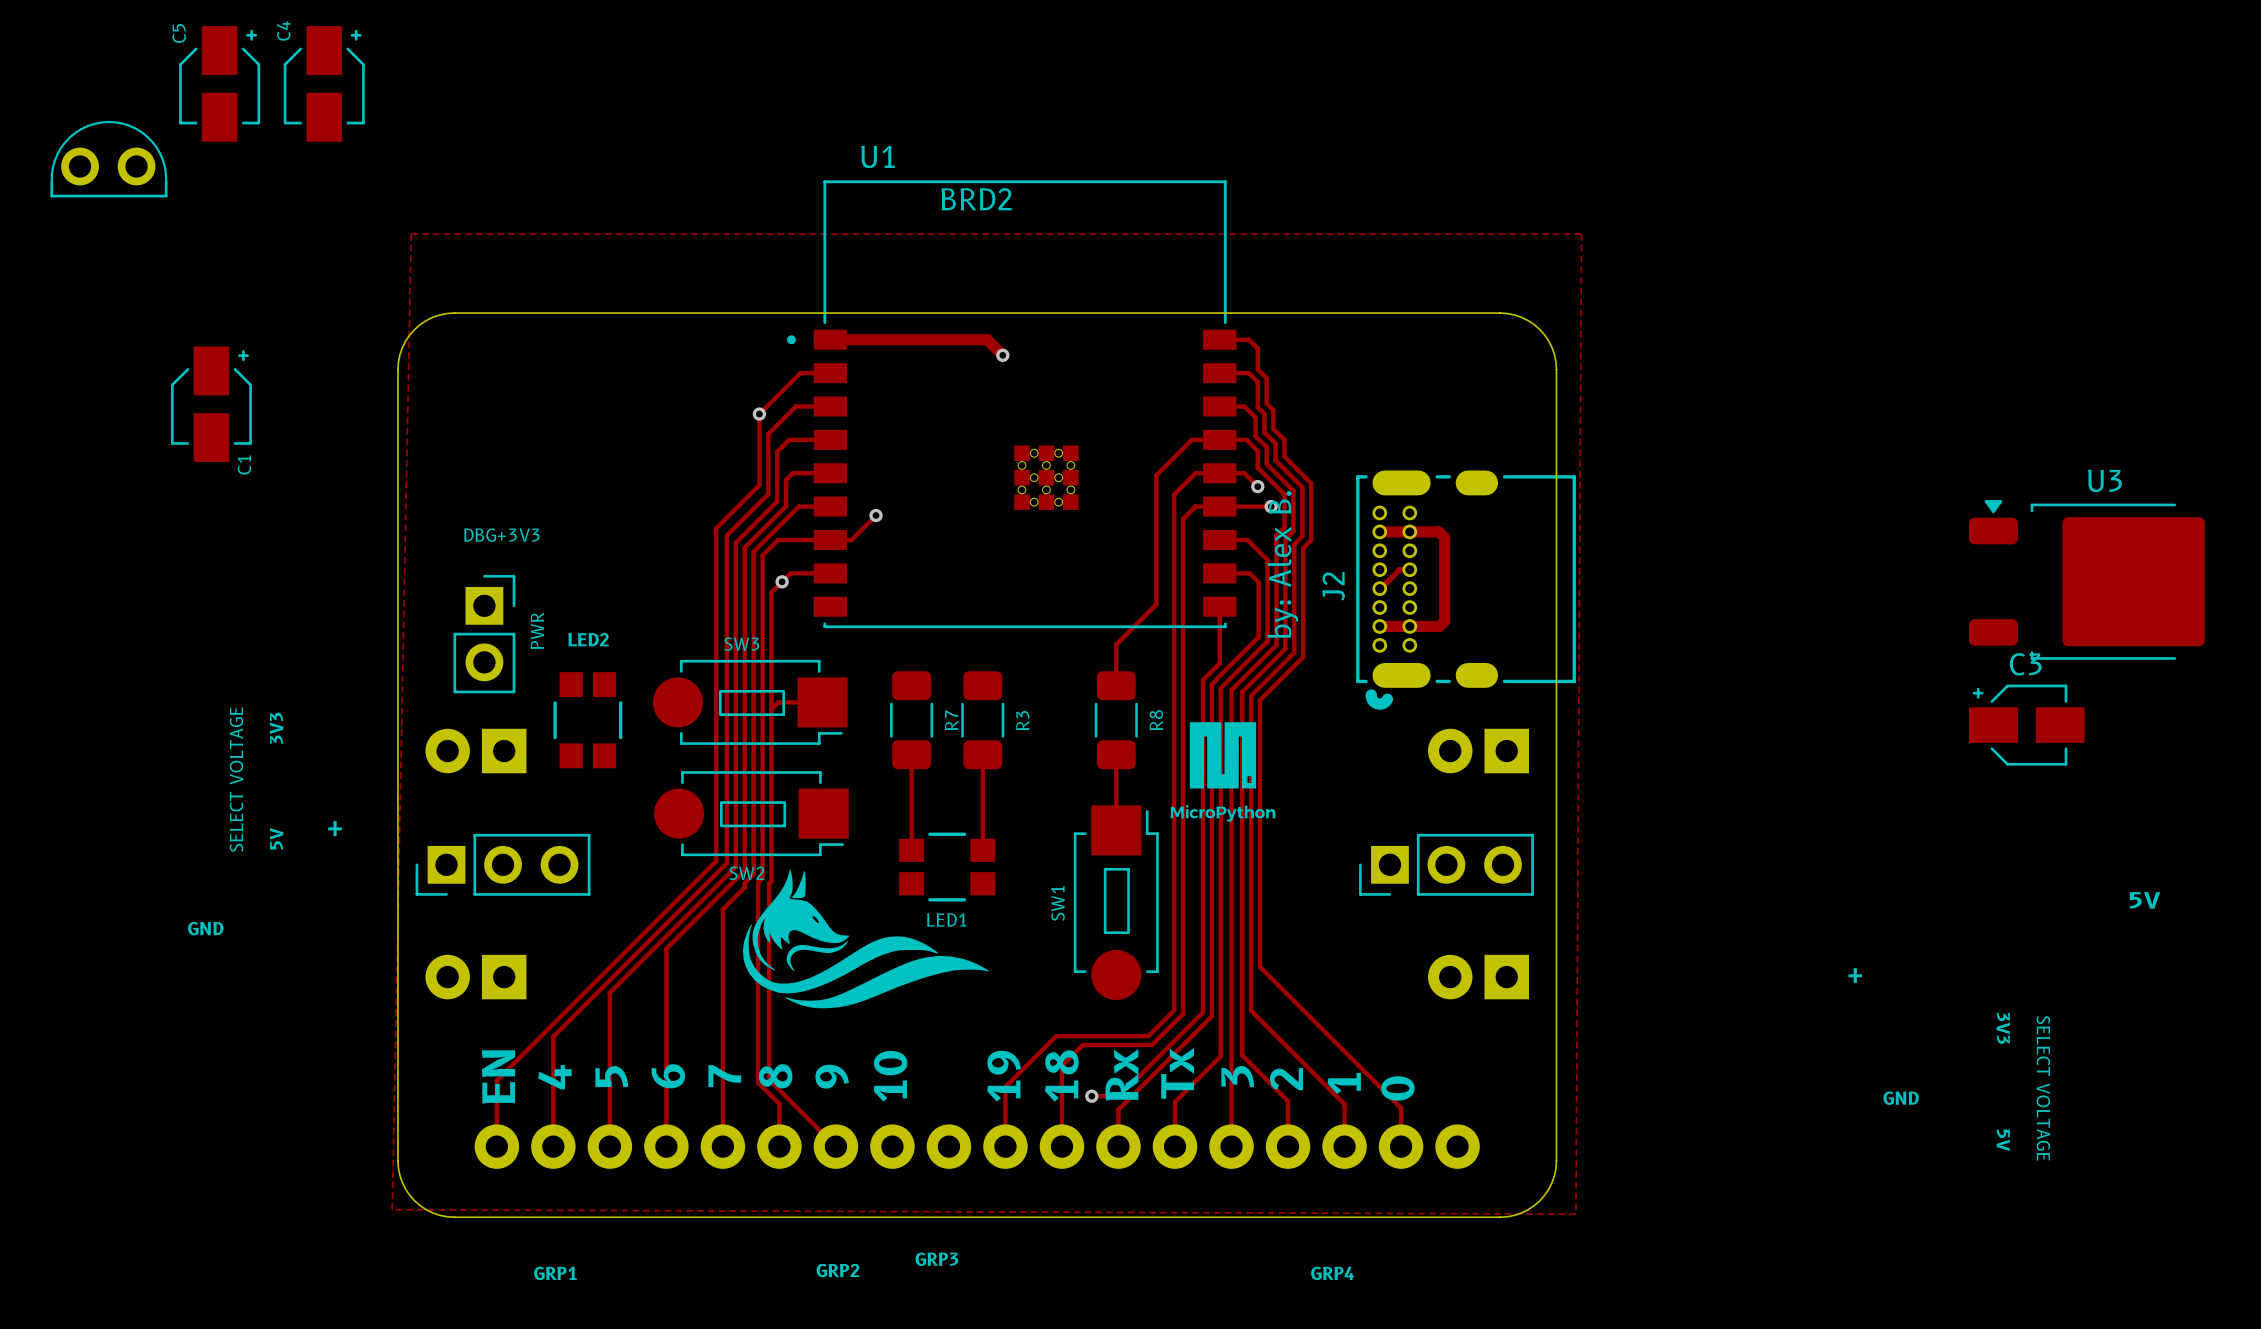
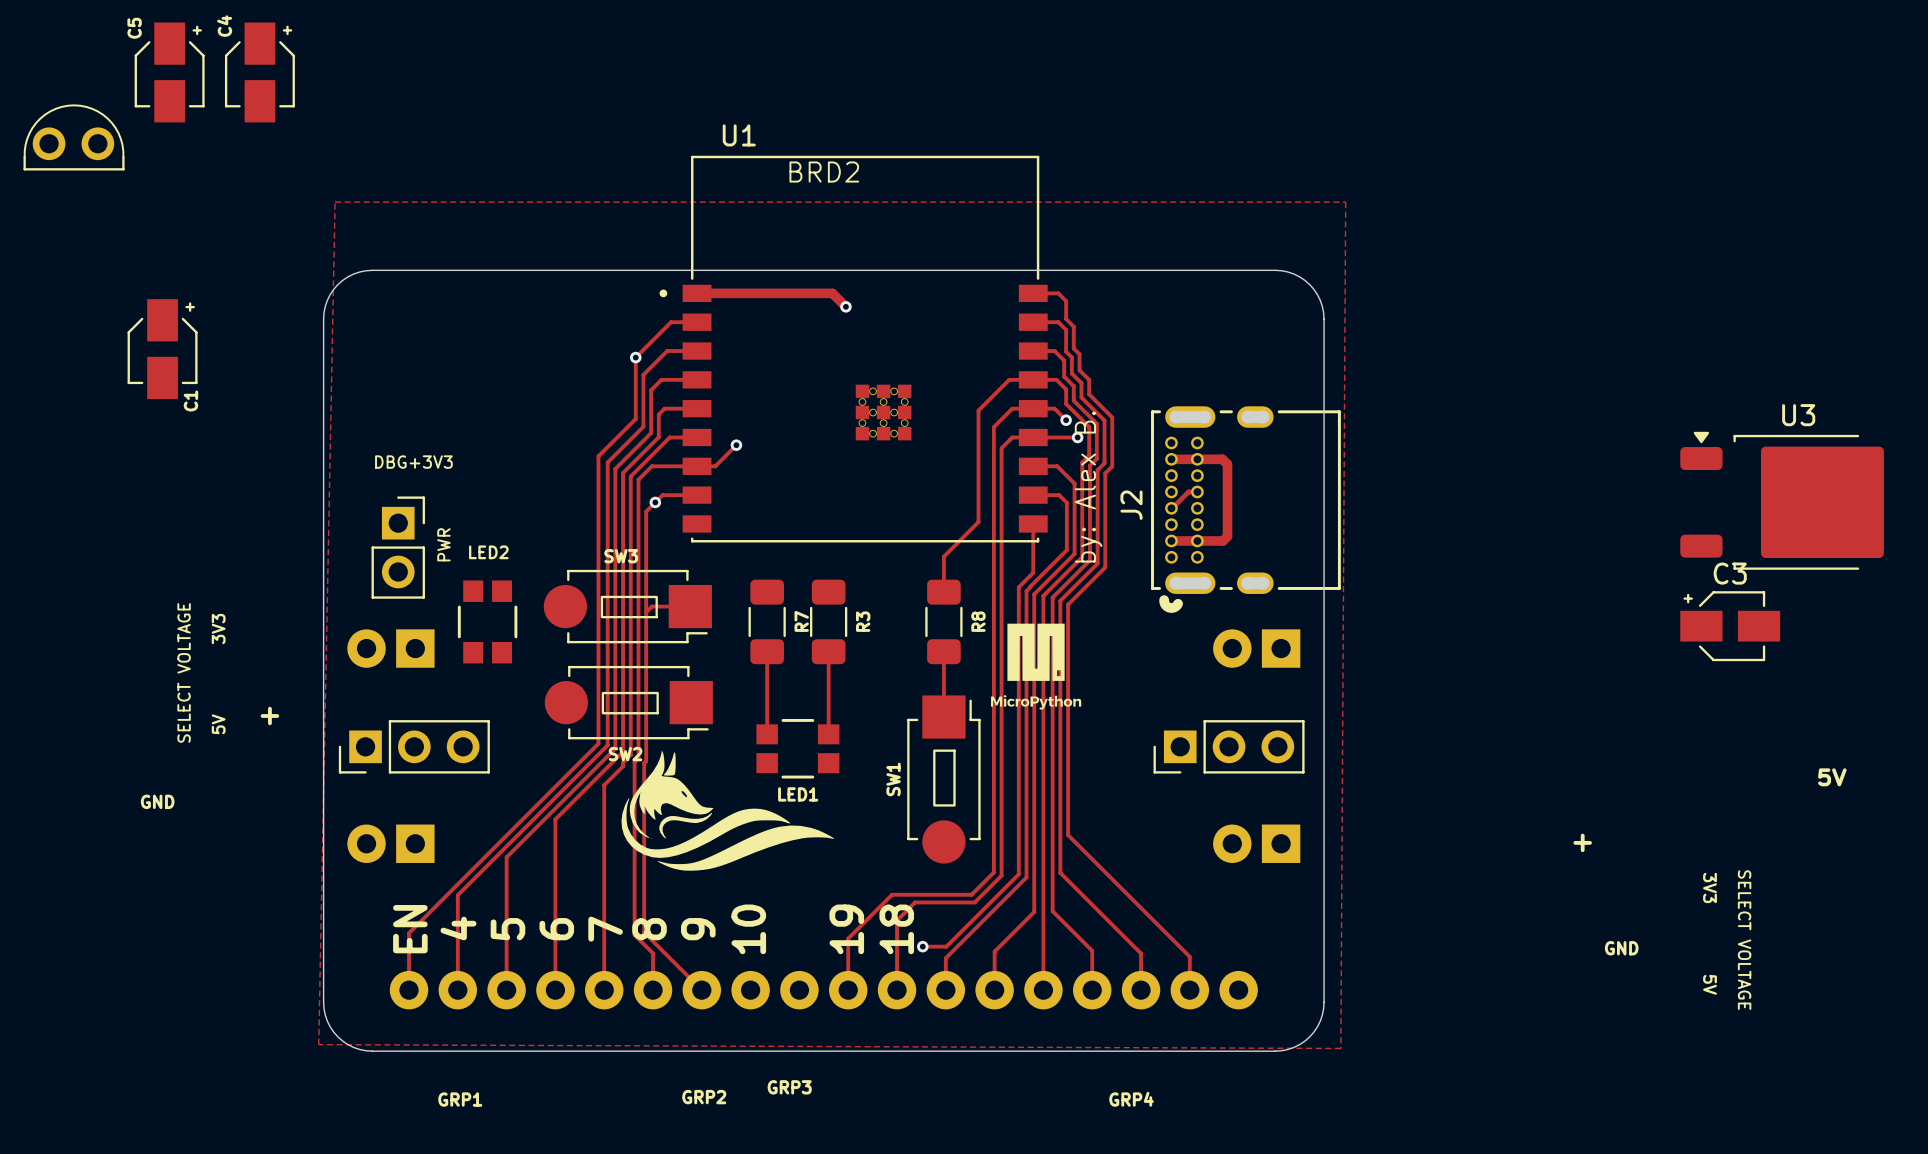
text: Tx (1177, 1073) -> none
text: Rx (1121, 1074) -> none
text: 3 (1237, 1076) -> none
text: 2 (1286, 1079) -> none
text: 1 (1344, 1083) -> none
text: 0 (1397, 1088) -> none

